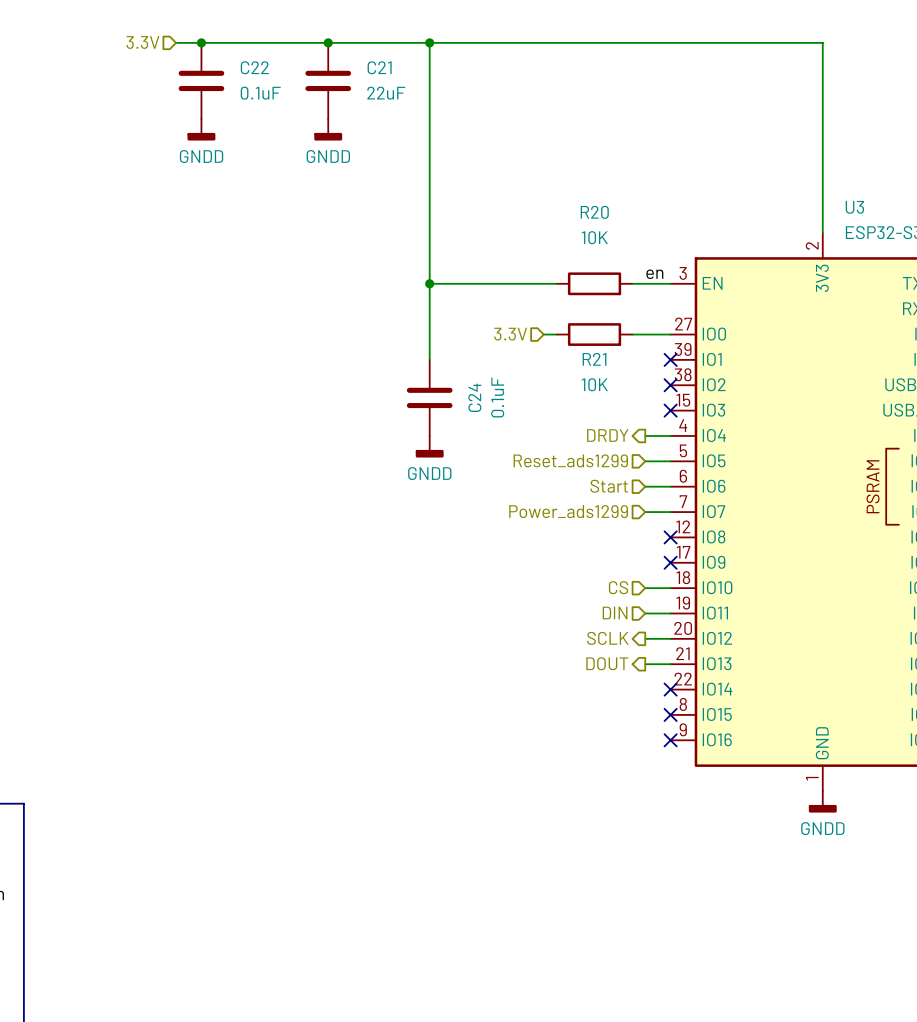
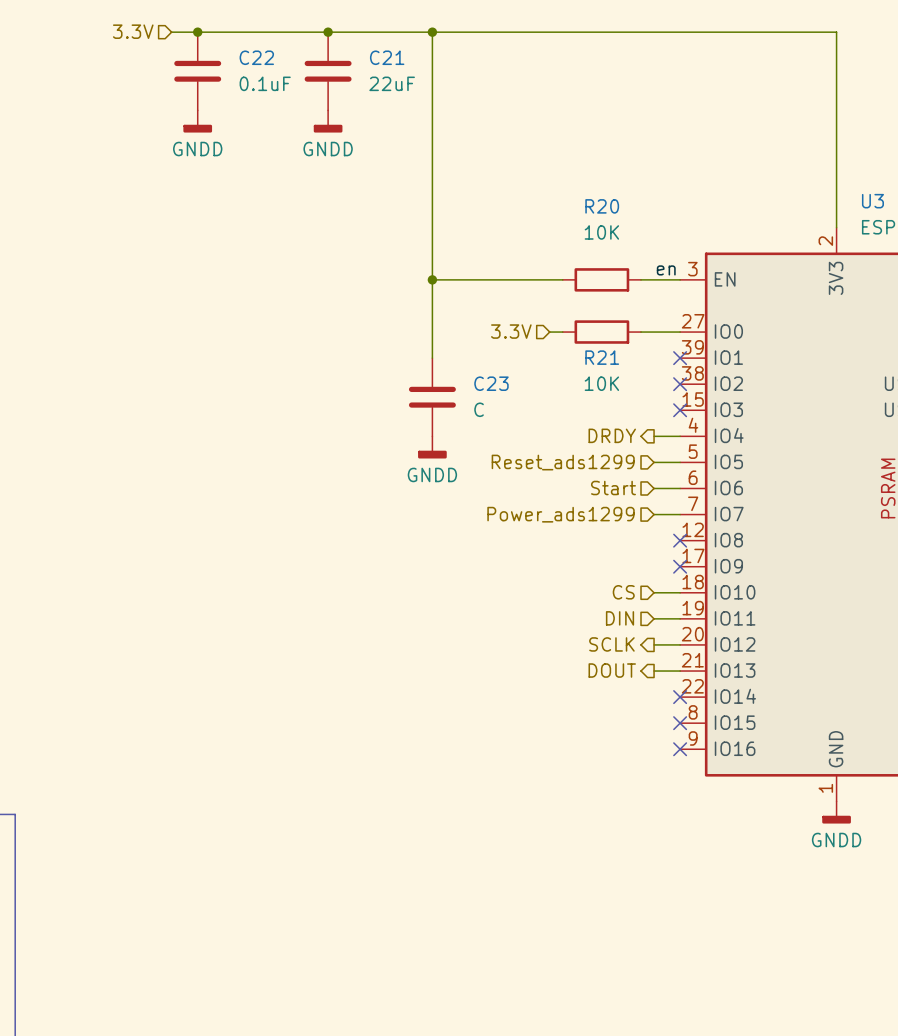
C24 name: C24 (474, 397) -> C23 (491, 383)
C24 value: 0.1uF (497, 397) -> C (479, 409)

